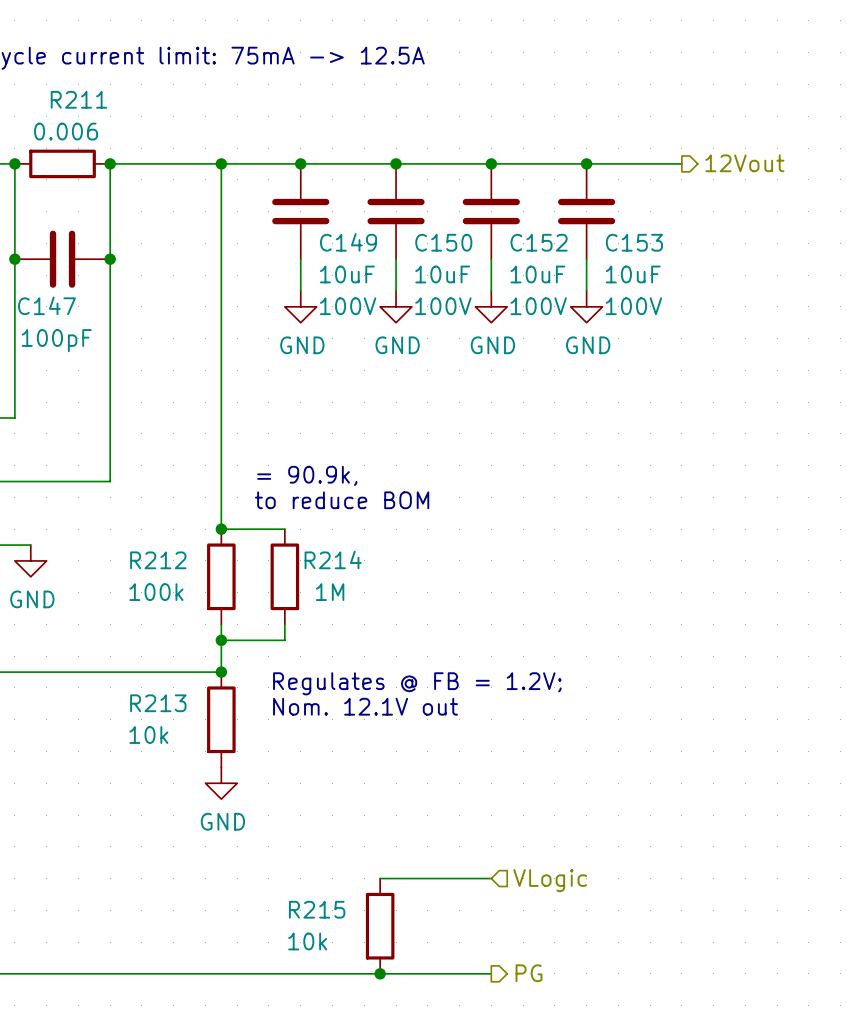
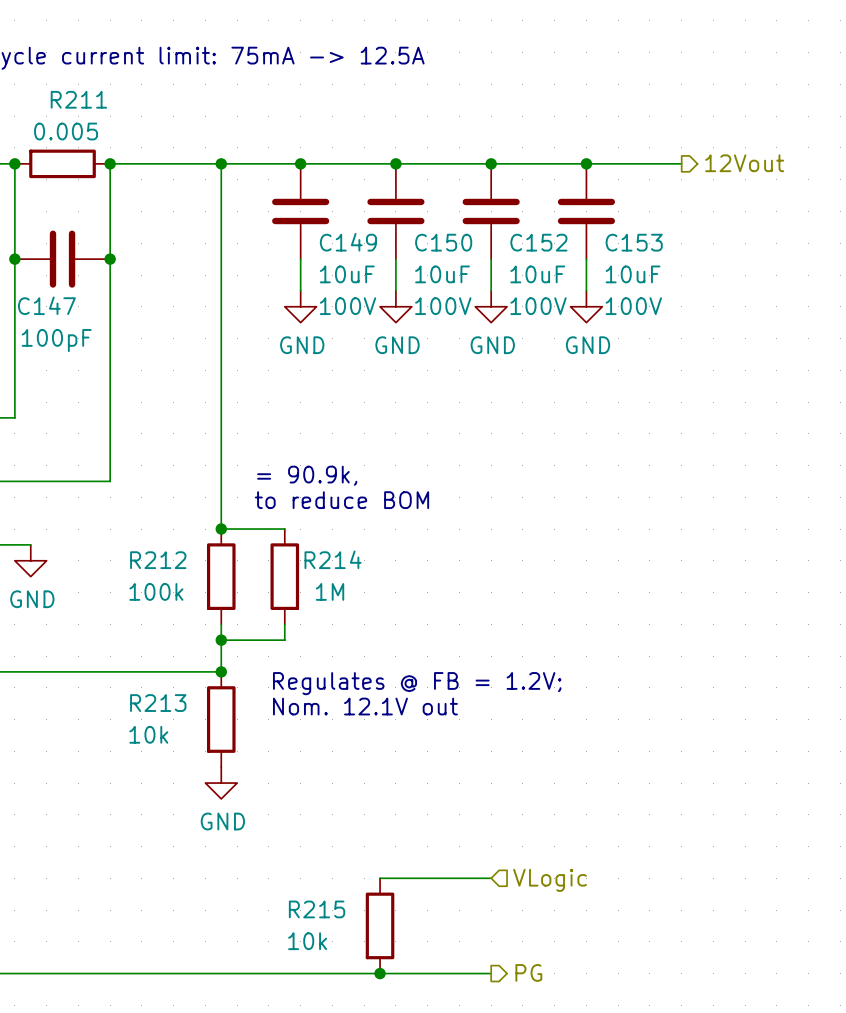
R211 value: 0.006 (66, 131) -> 0.005 (66, 131)

